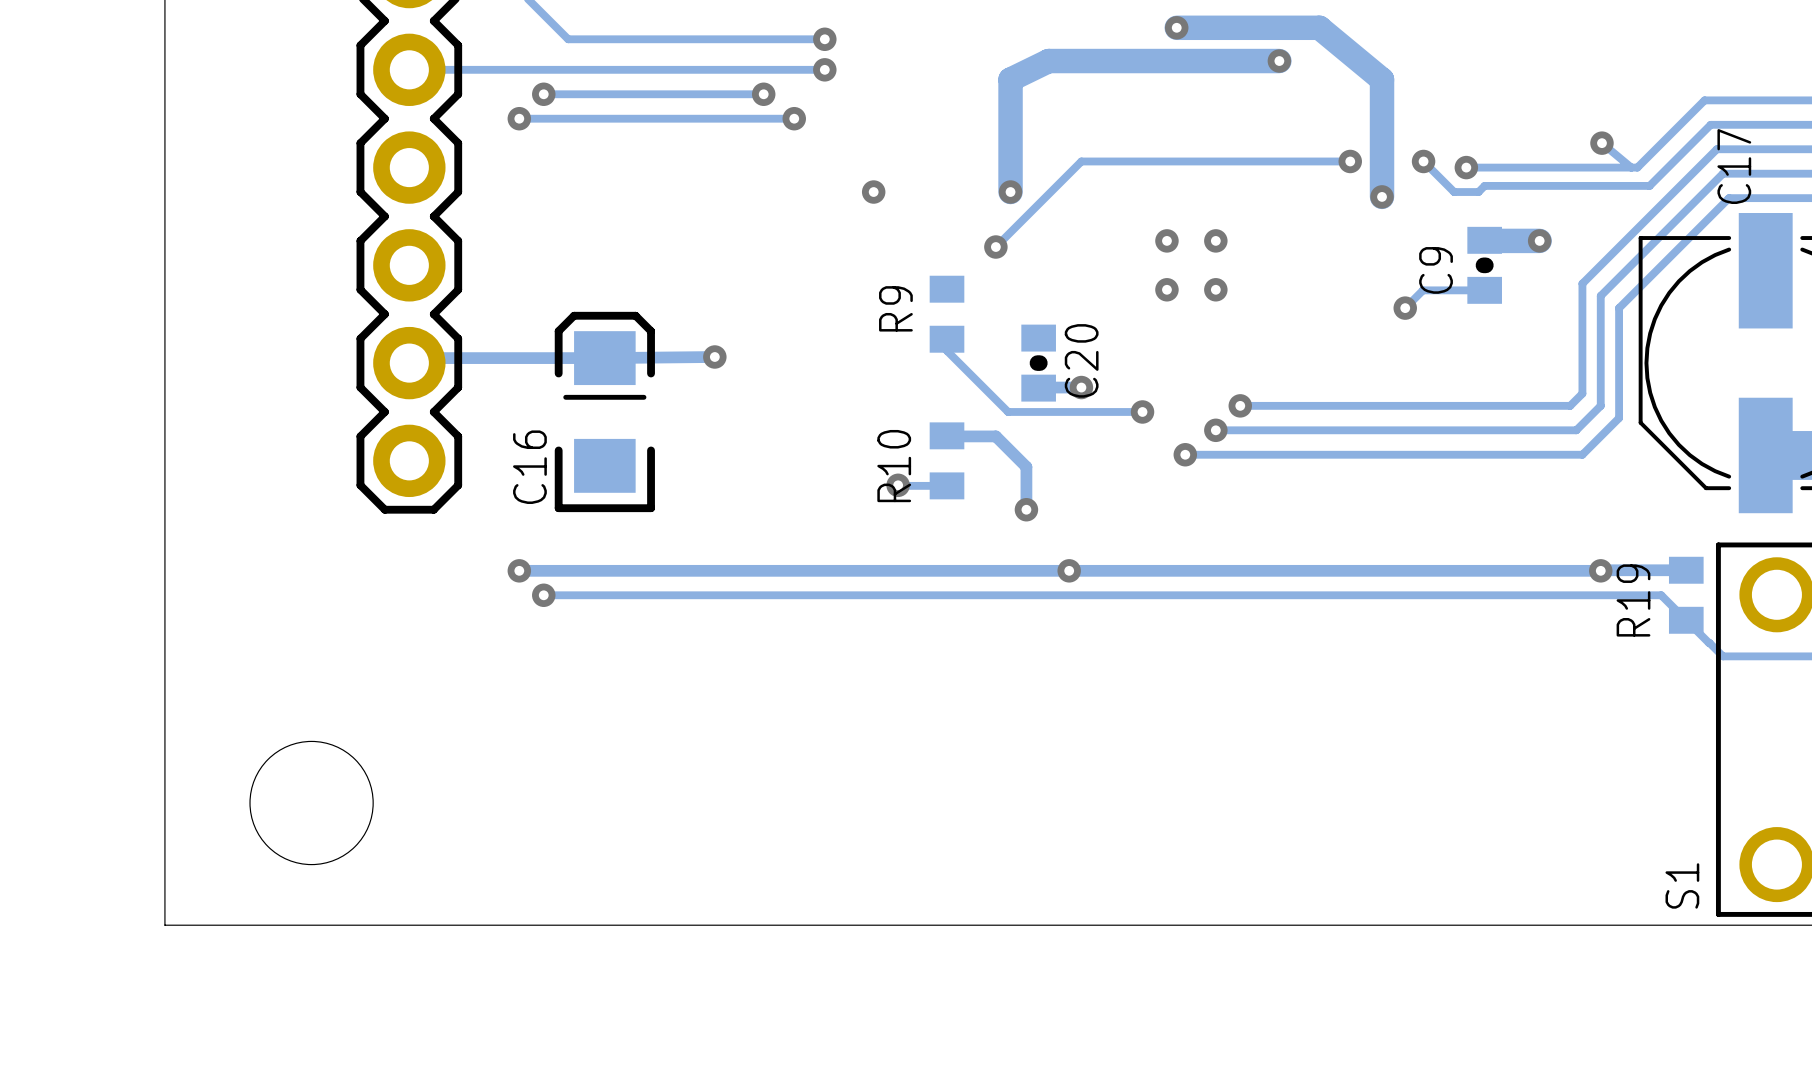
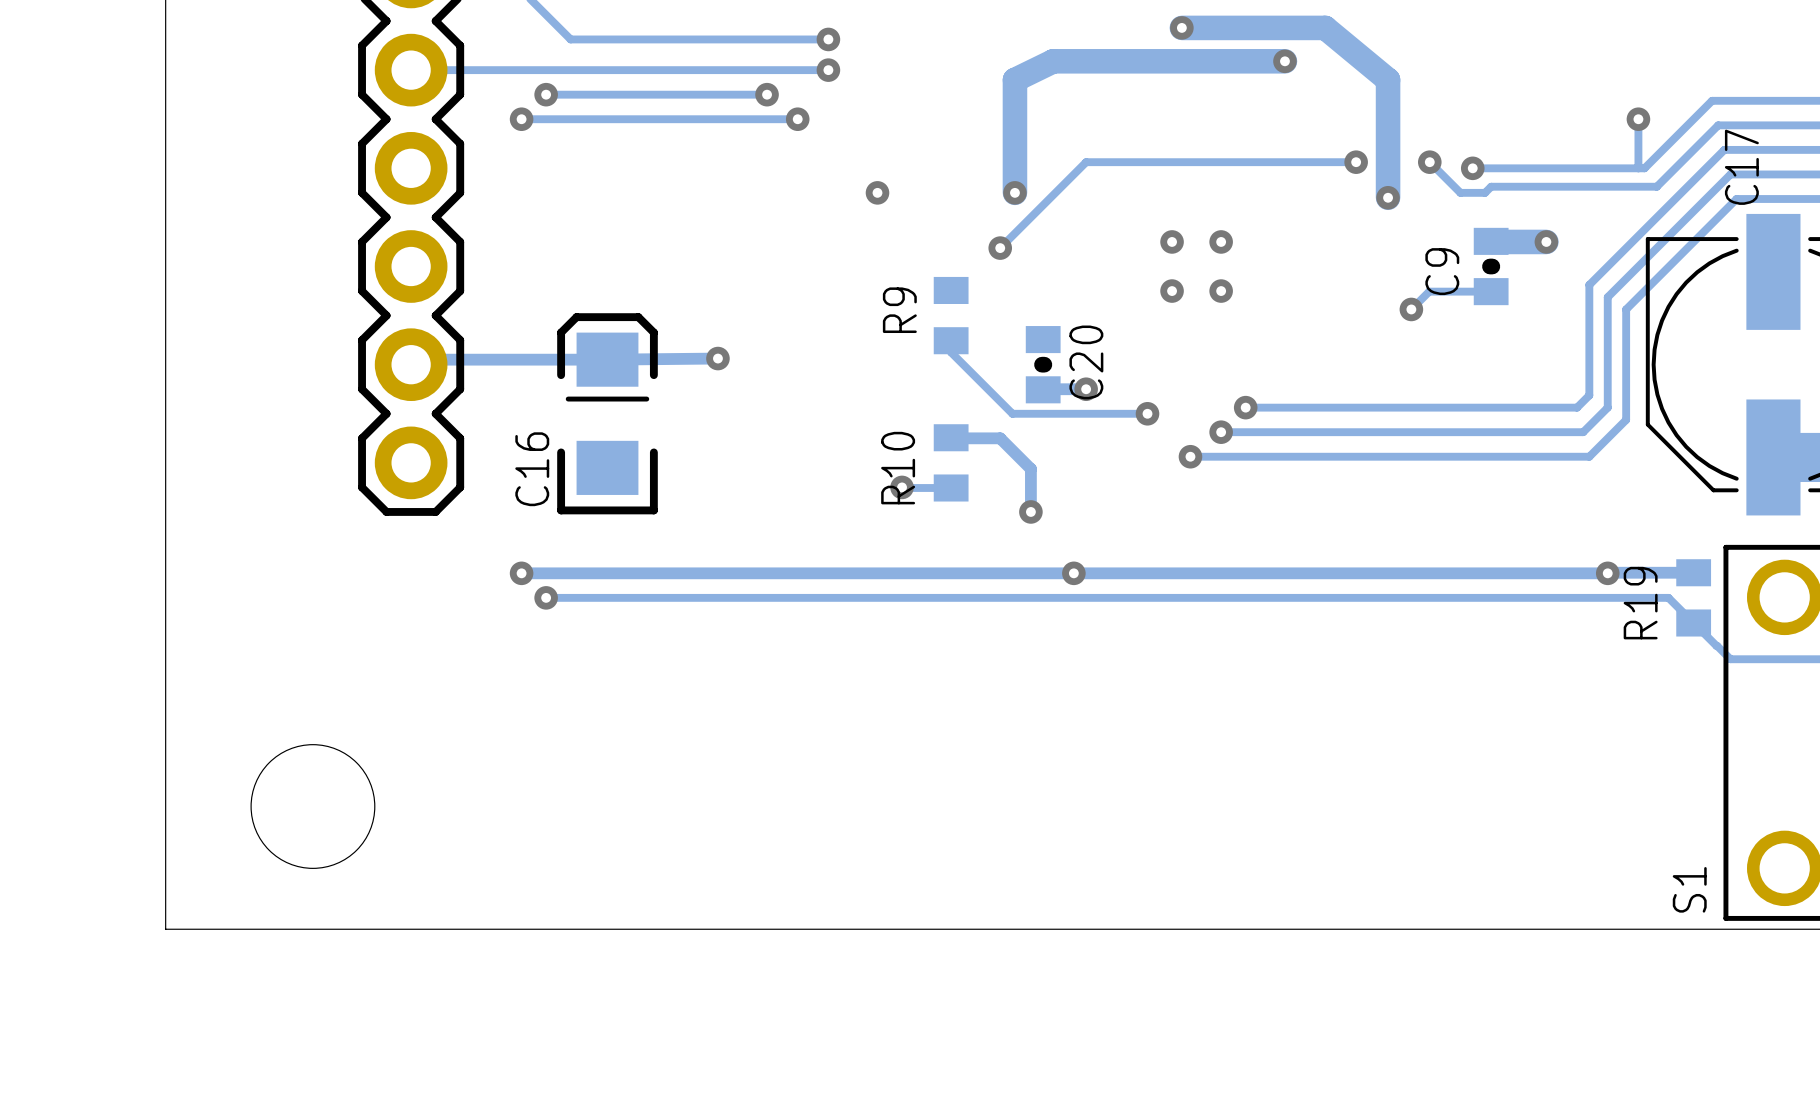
track: (1601, 143) (1631, 167) -> (1638, 119) (1638, 168)
via position: (1601, 143) -> (1638, 119)

